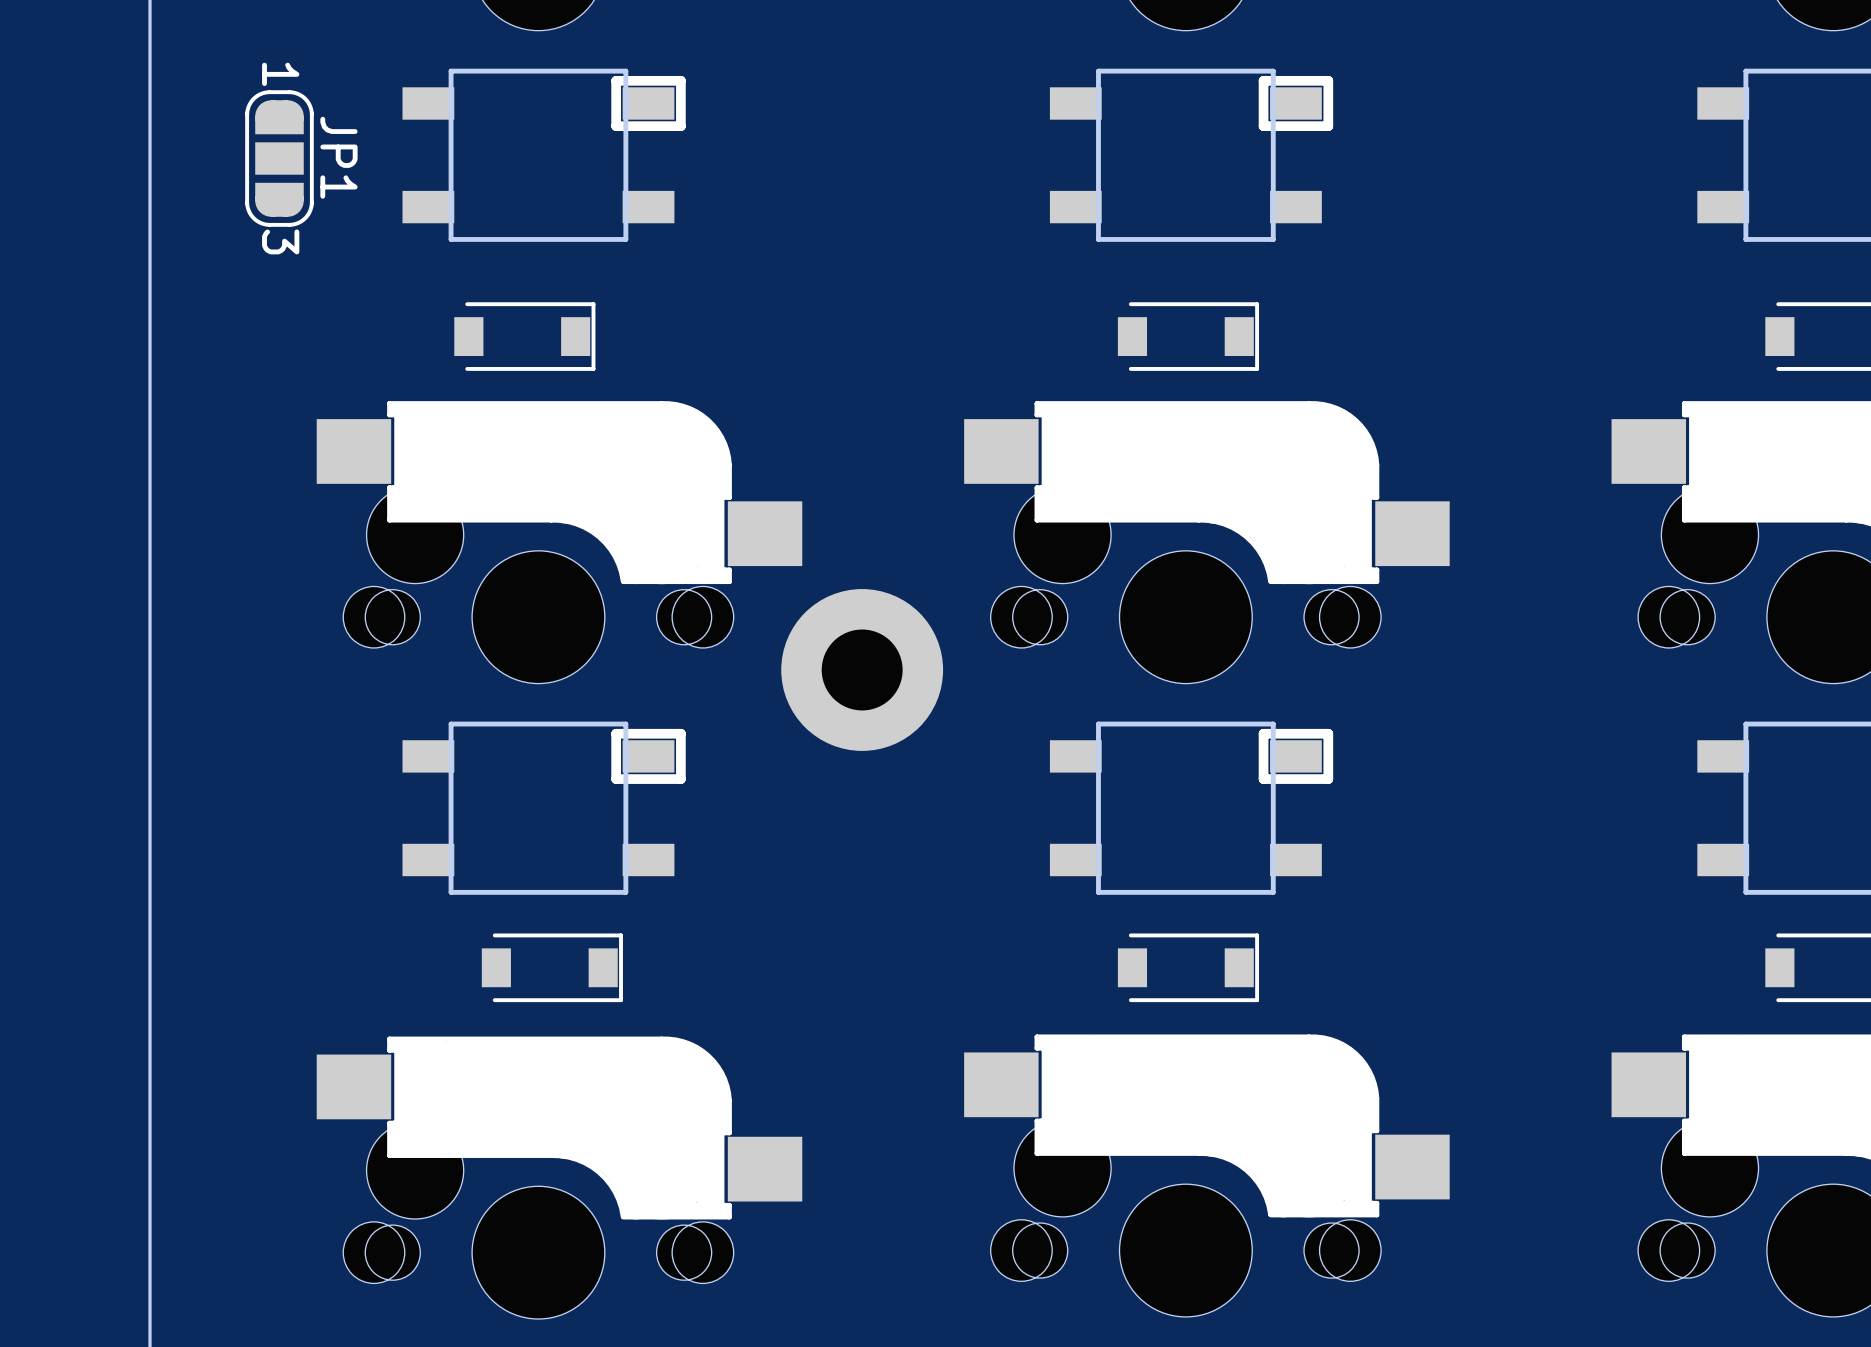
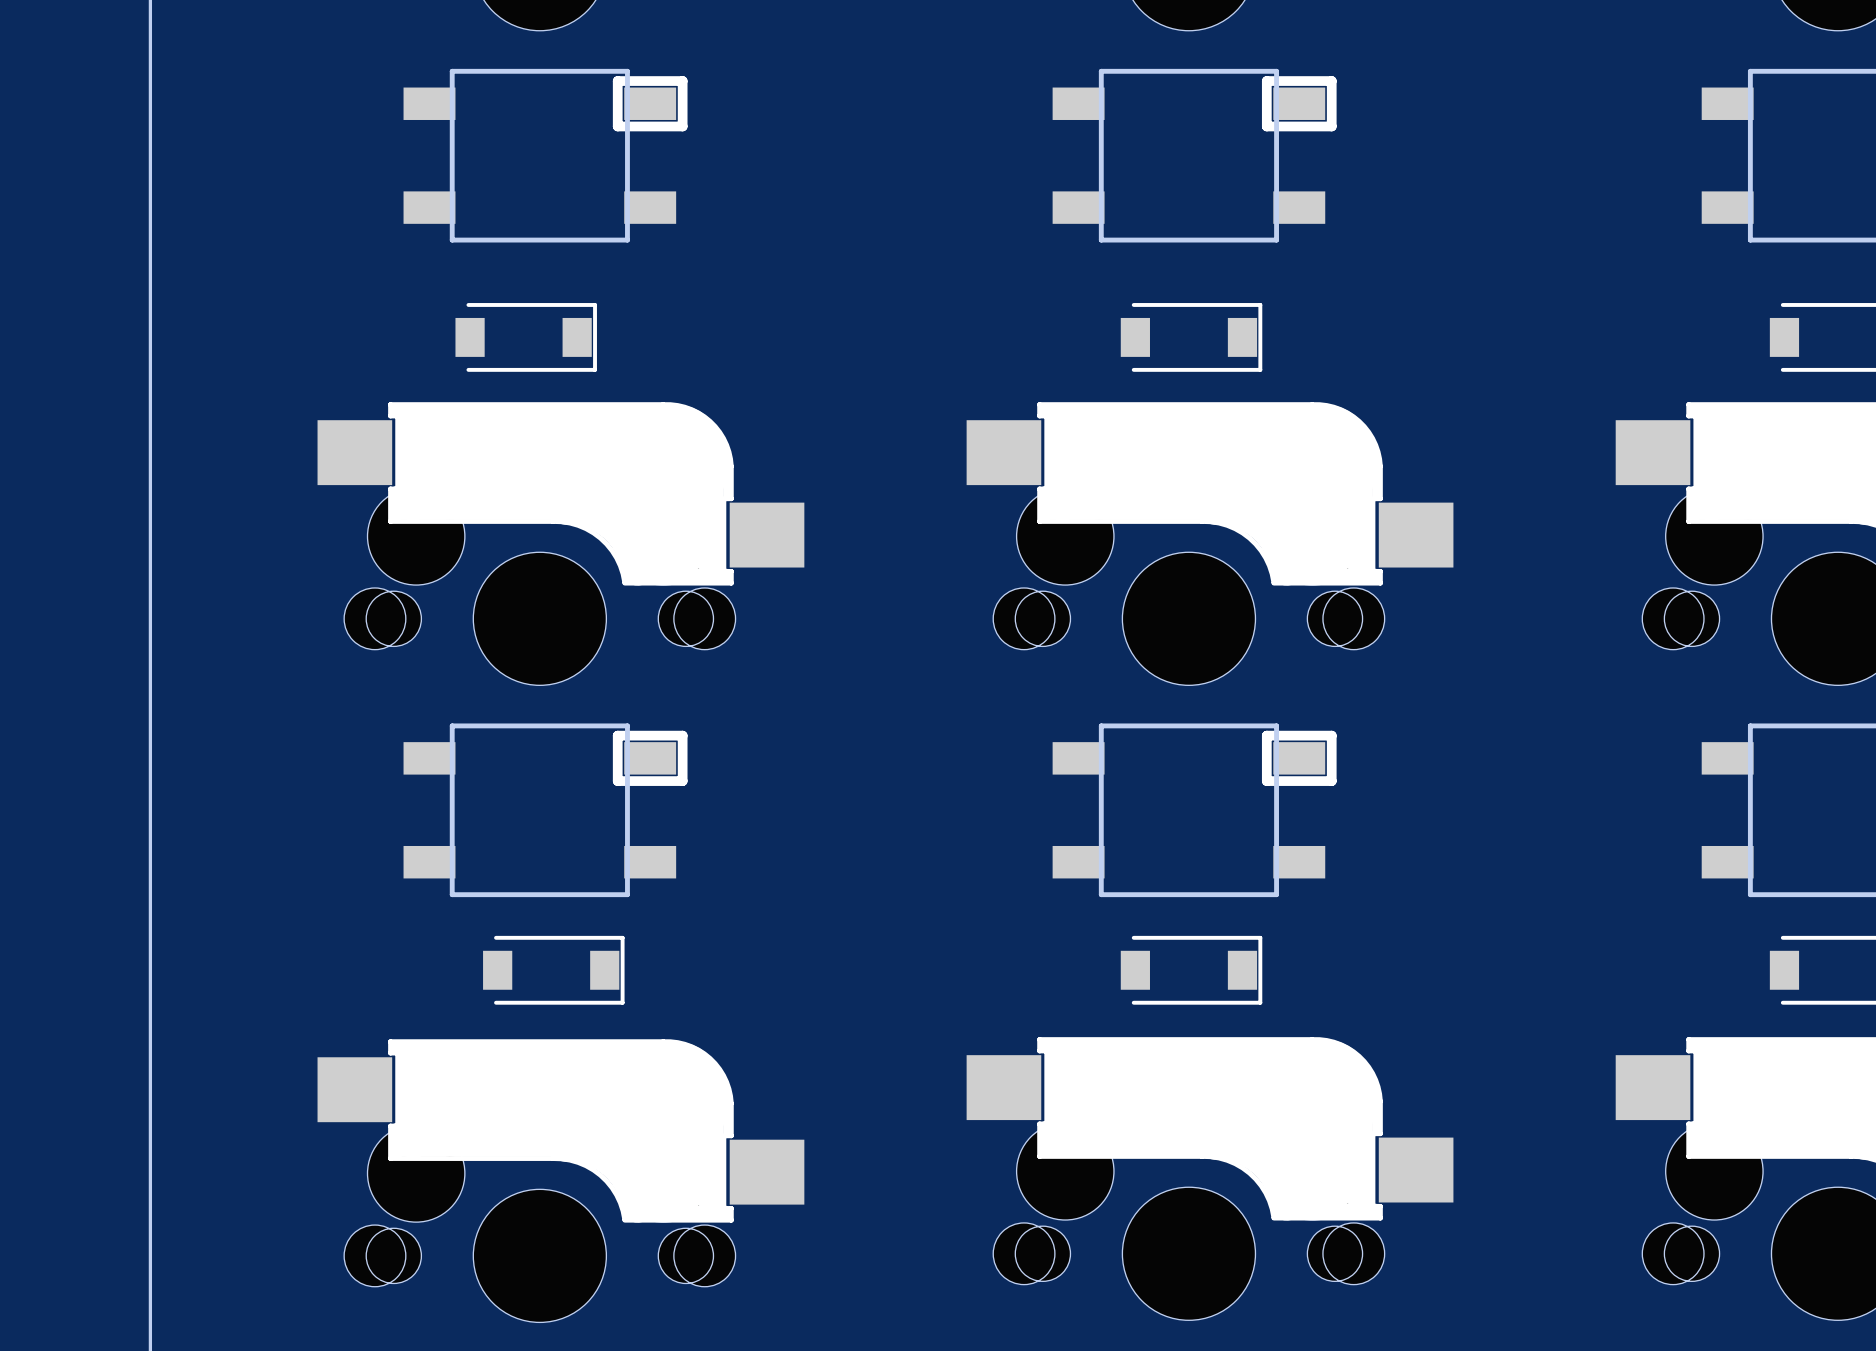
JP1: (279, 158) -> none
part: (862, 669) -> none

